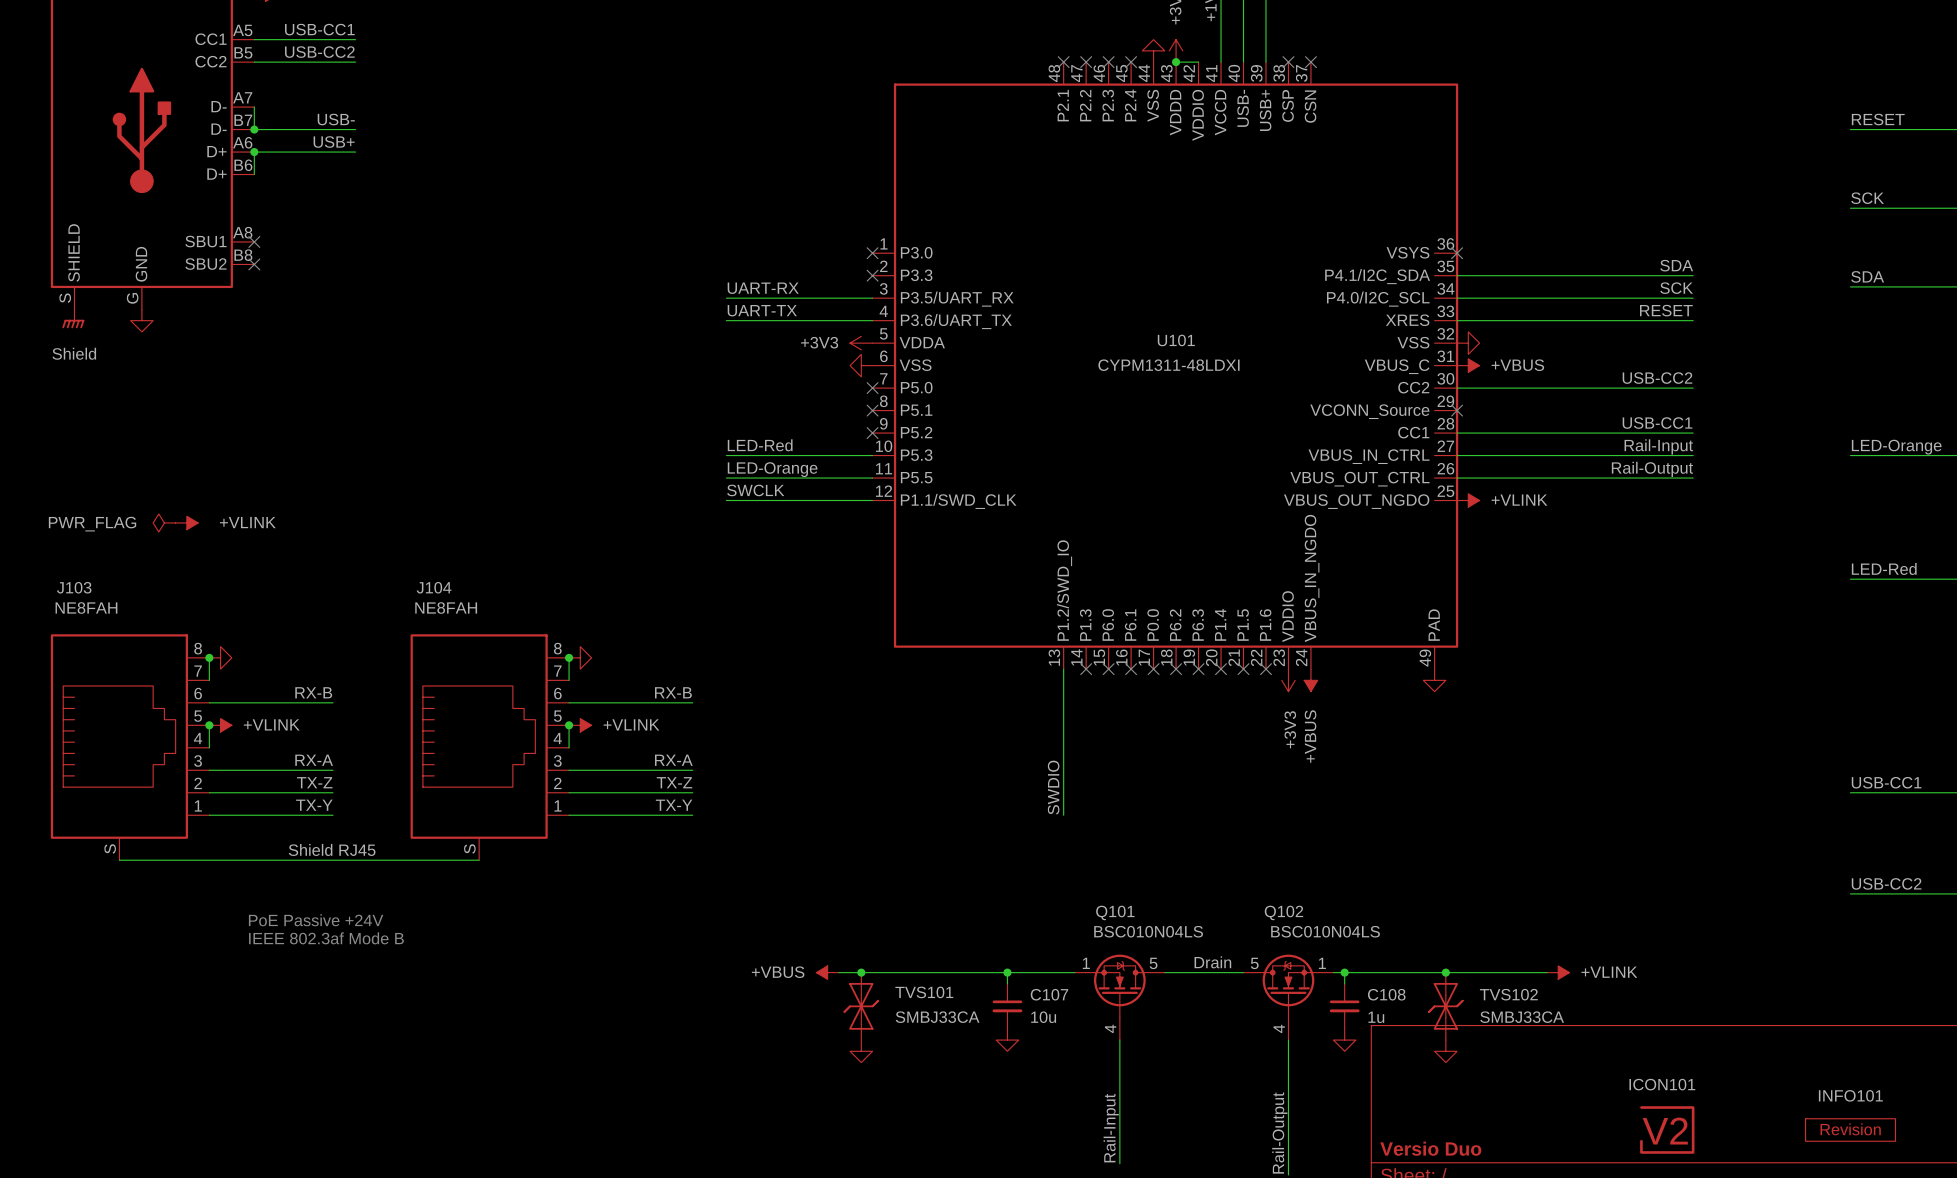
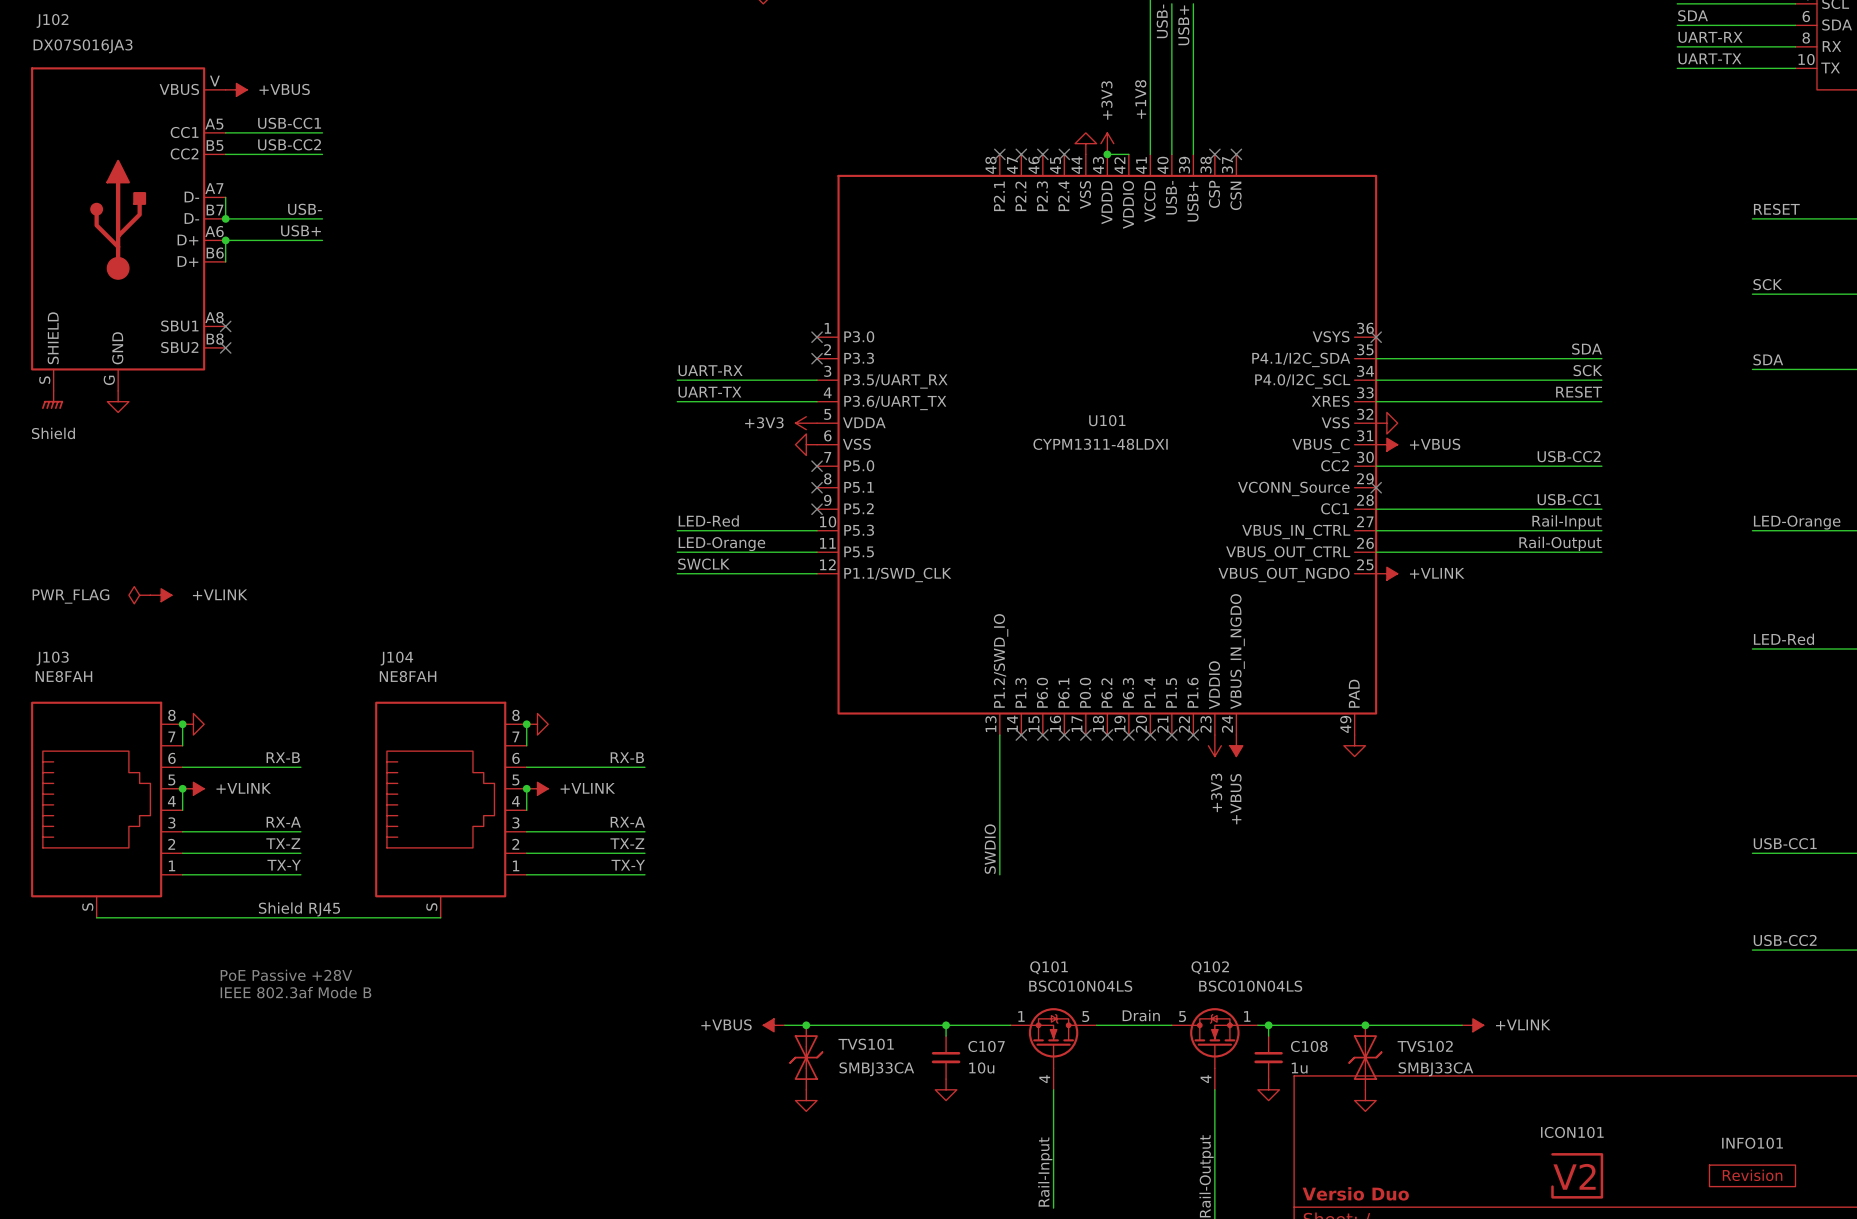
text: PoE Passive +24V (316, 920) -> PoE Passive +28V (286, 975)

